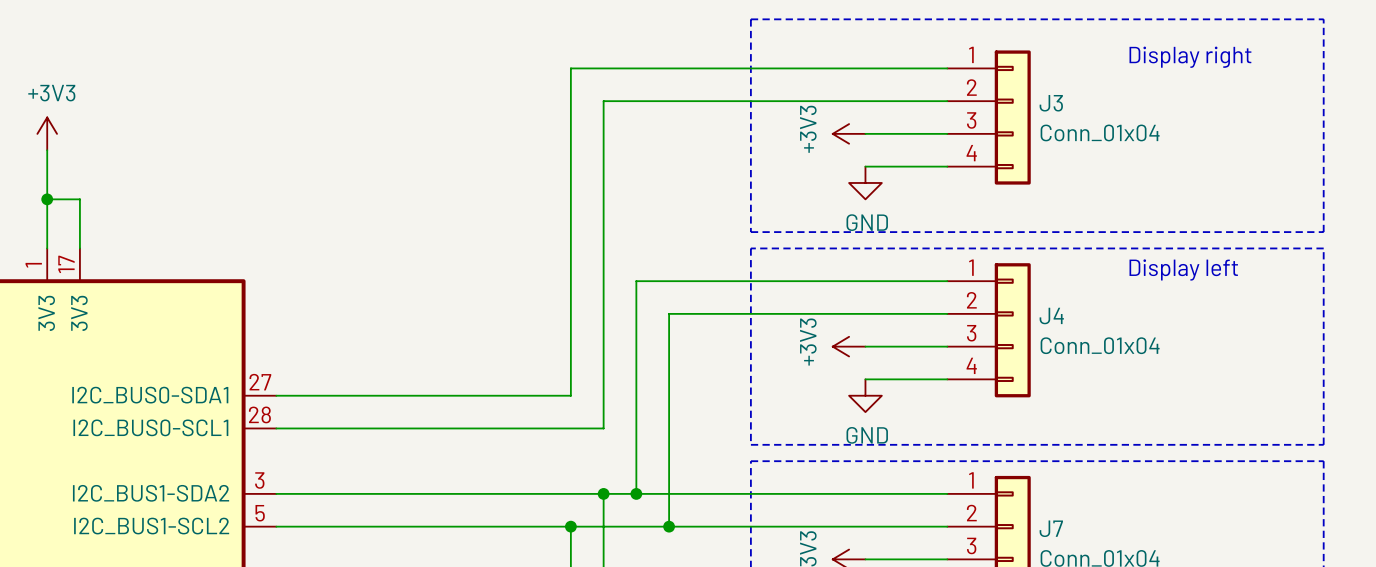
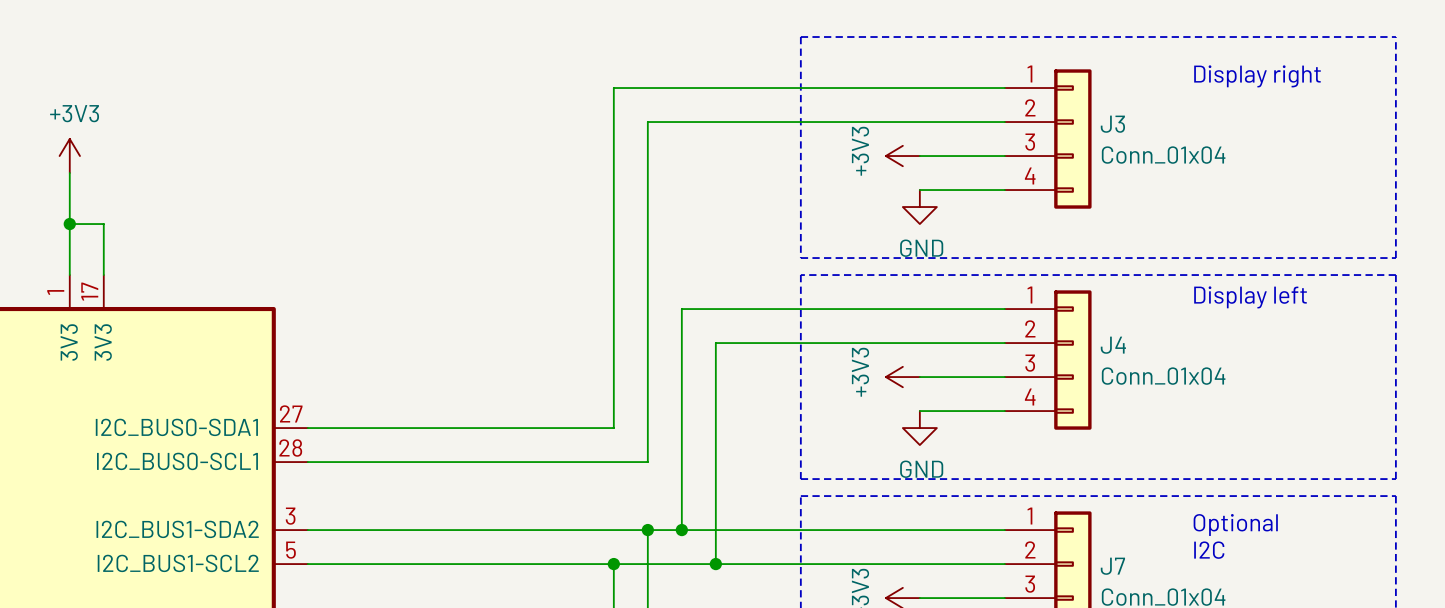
text: none -> Optional (1235, 524)
text: none -> I2C (1209, 550)

